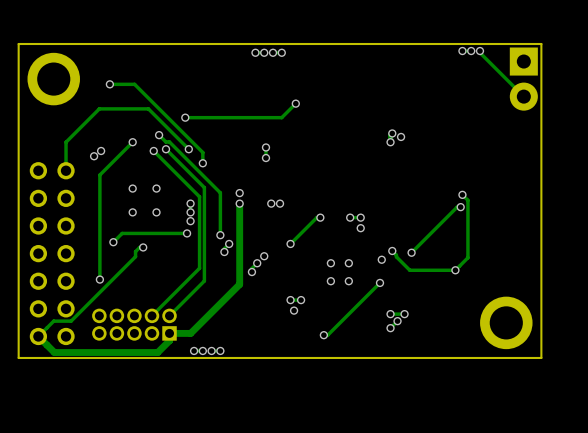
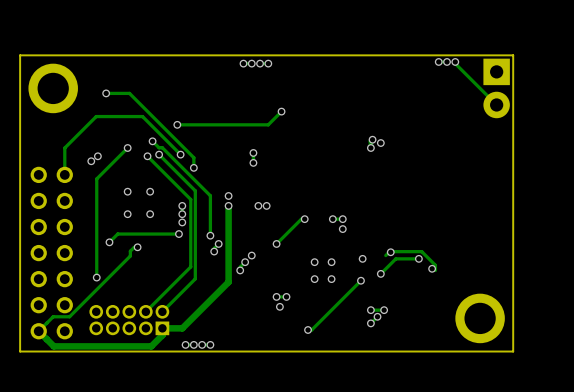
track: (462, 194) (467, 200) (467, 257) (455, 270) (409, 270) (392, 250) -> none
via: (462, 194) -> none
track: (460, 207) (457, 207) (411, 252) -> none
via: (460, 207) -> none
via: (392, 250) -> none
track: none -> (385, 255) (389, 251) (421, 251) (435, 265) (435, 270)
track: none -> (418, 258) (395, 258) (380, 273)
via: none -> (418, 258)
via: none -> (380, 273)

